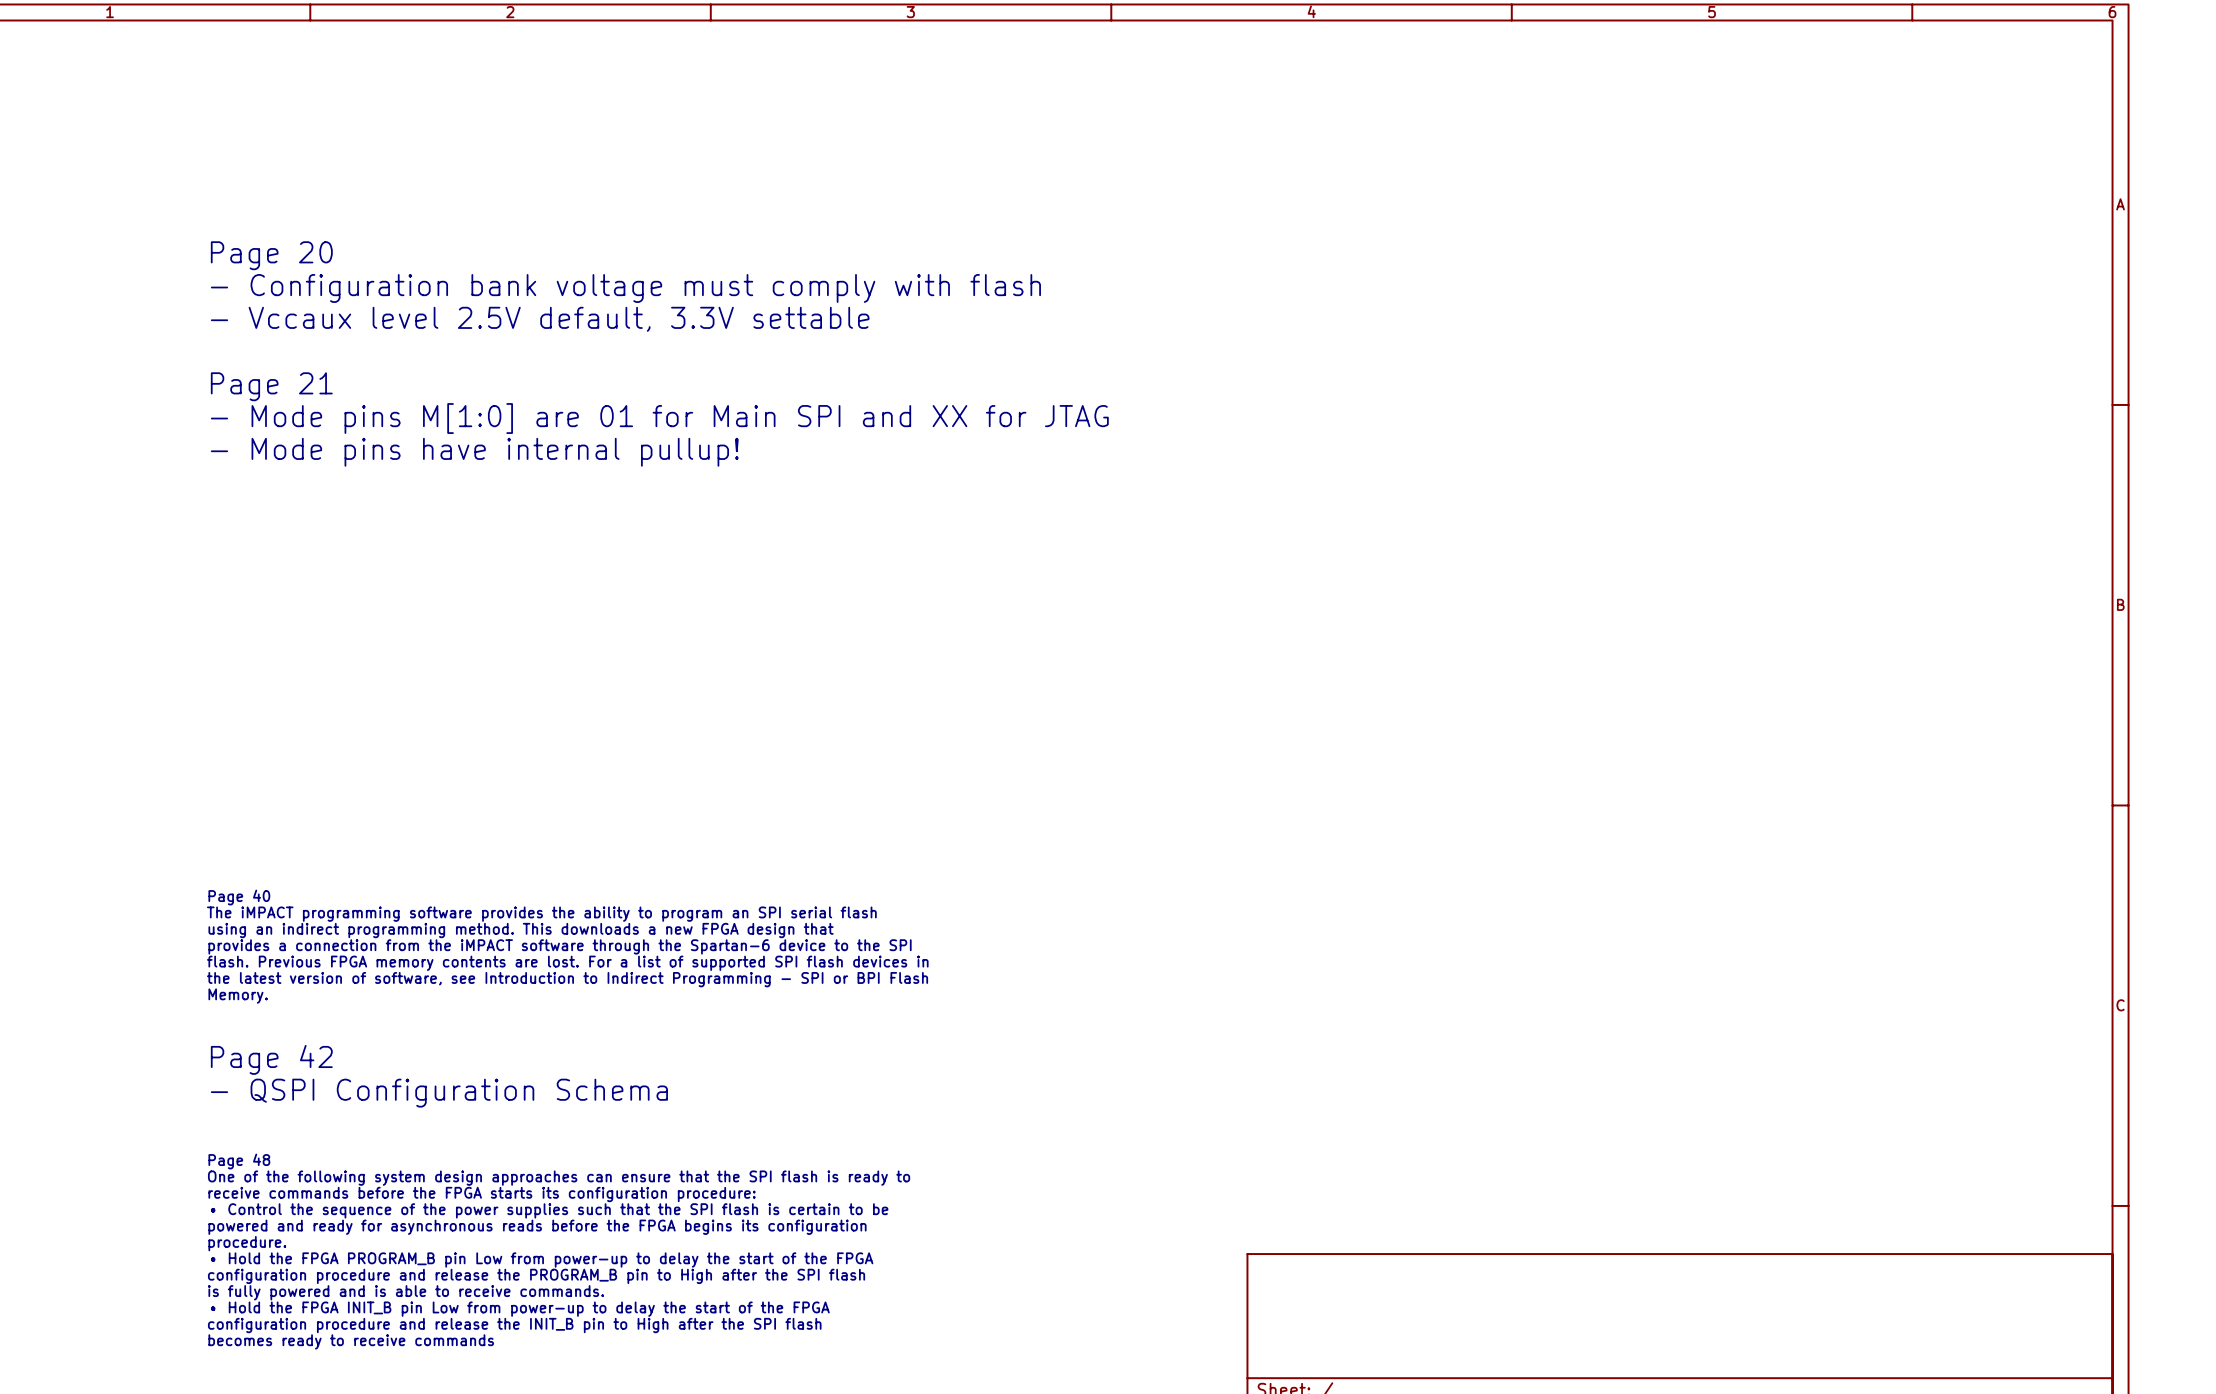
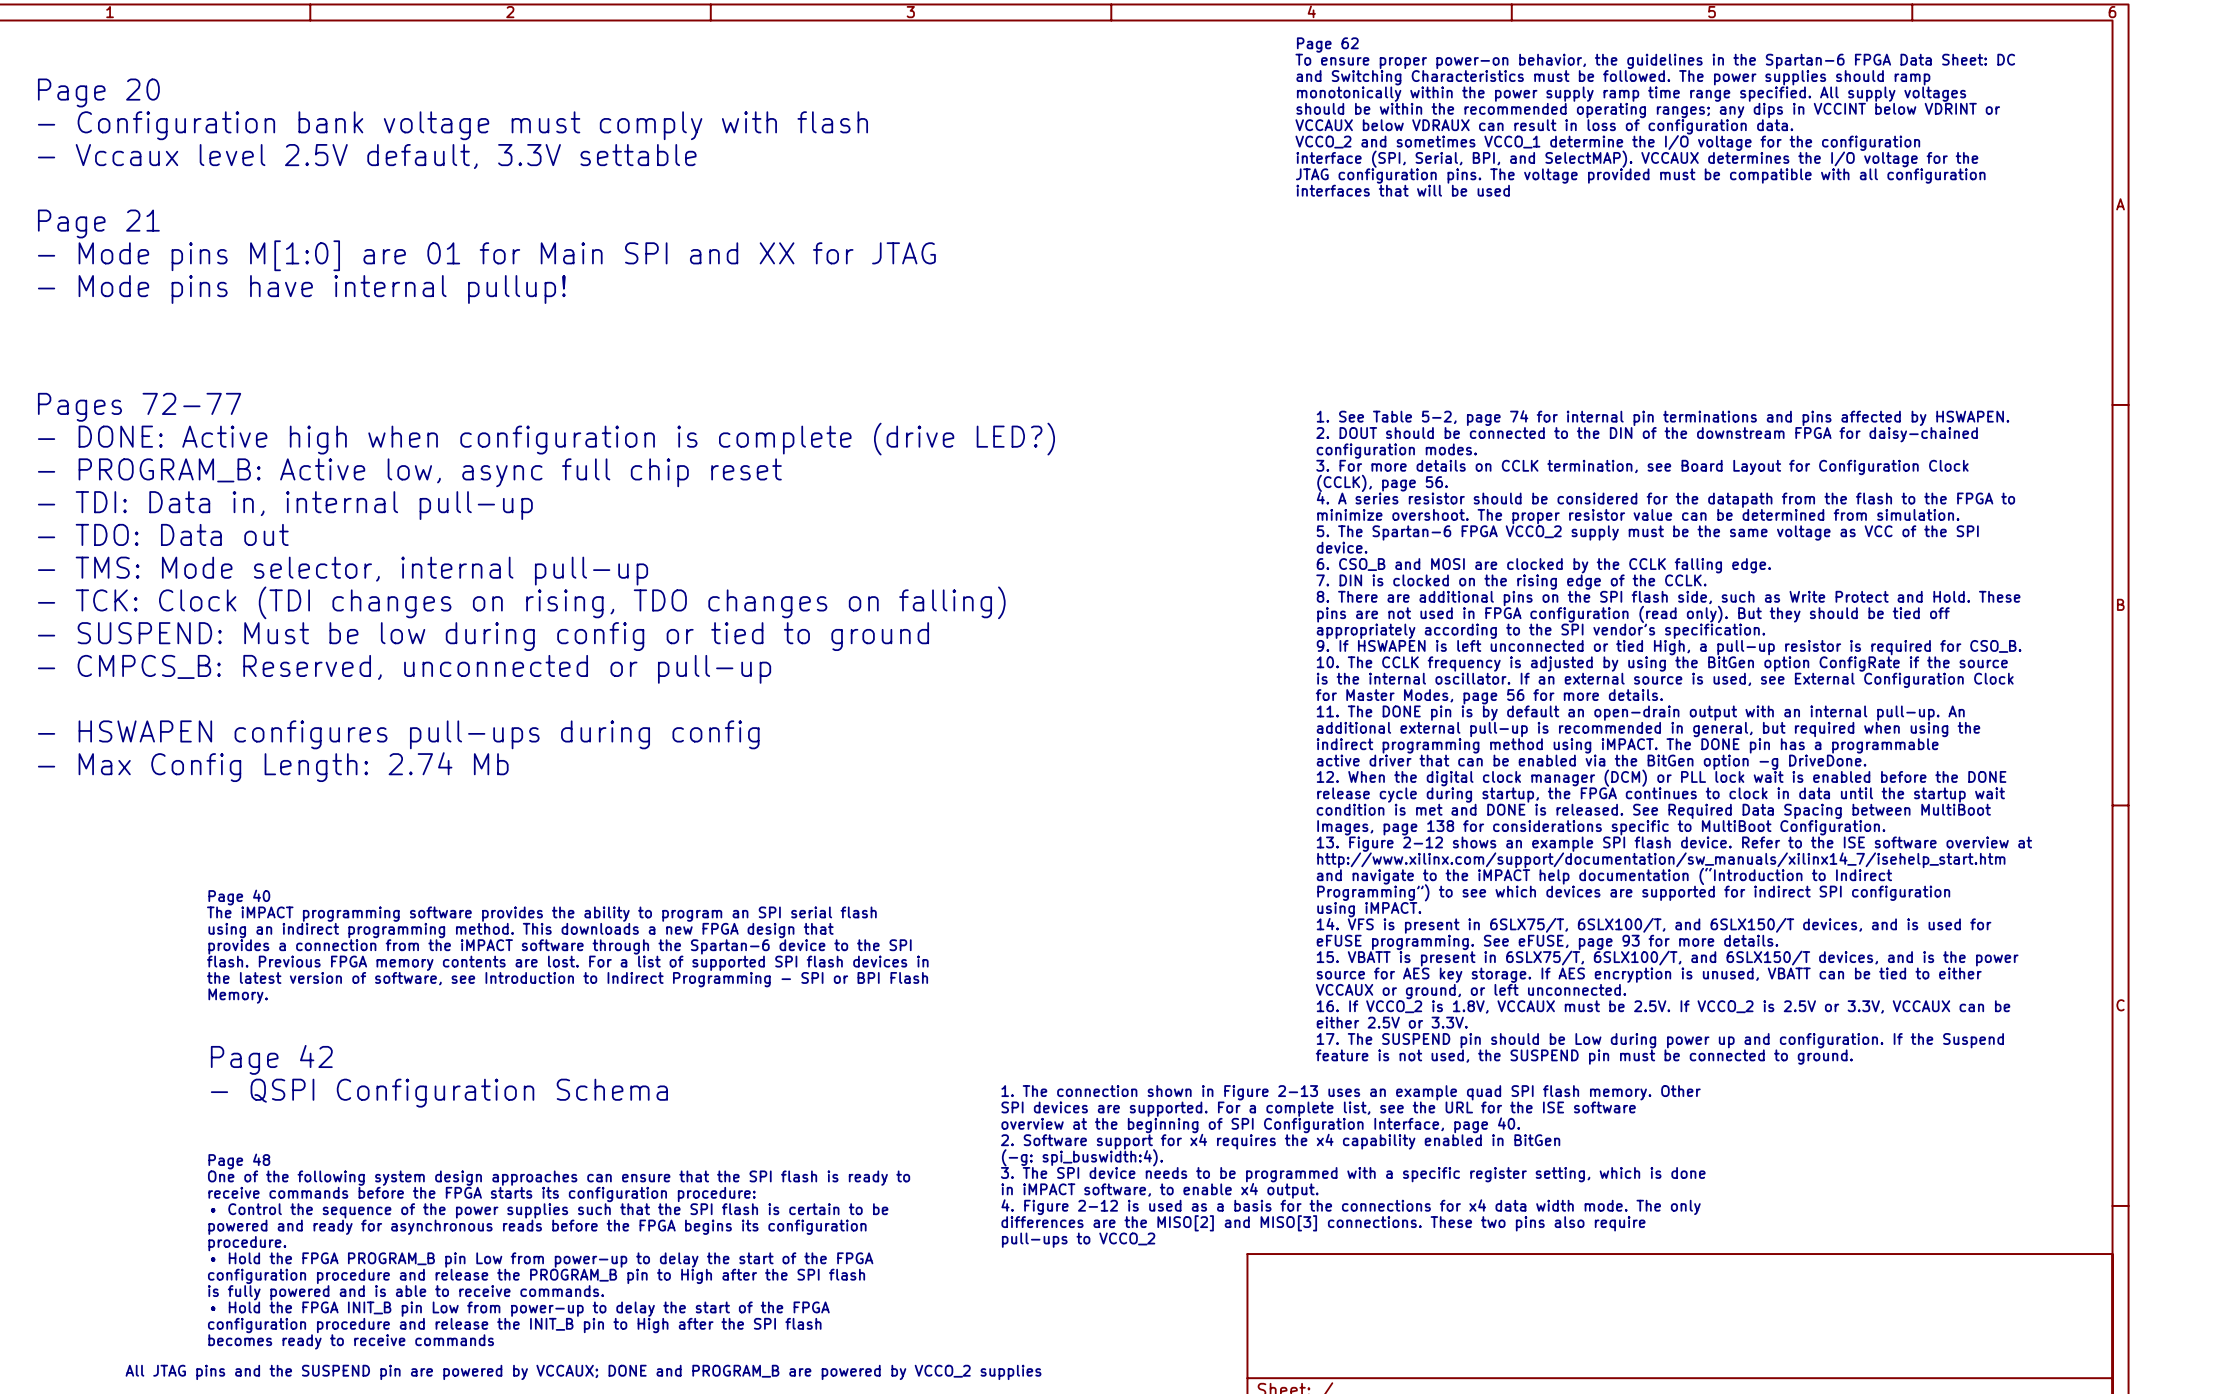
text: none -> Page 62 (1327, 45)
text: none -> To ensure proper power-on behavior, the guidelines in the Spartan-6 FPGA Data Sheet: DC (1655, 61)
text: none -> and Switching Characteristics must be followed. The power supplies should ramp (1613, 77)
text: none -> Page 20 (98, 92)
text: none -> monotonically within the power supply ramp time range specified. All supply voltages (1631, 94)
text: none -> should be within the recommended operating ranges; any dips in VCCINT below VDRINT or (1648, 110)
text: none -> - Configuration bank voltage must comply with flash (452, 125)
text: none -> VCCAUX below VDRAUX can result in loss of configuration data. (1544, 126)
text: none -> VCCO_2 and sometimes VCCO_1 determine the I/O voltage for the configuration (1607, 143)
text: none -> - Vccaux level 2.5V default, 3.3V settable (367, 156)
text: none -> interface (SPI, Serial, BPI, and SelectMAP). VCCAUX determines the I/O voltage for the (1637, 159)
text: none -> JTAG configuration pins. The voltage provided must be compatible with all configuration (1640, 176)
text: none -> interfaces that will be used (1403, 190)
text: none -> Page 21 (98, 223)
text: Page 20 (271, 255) -> none
text: none -> - Mode pins M[1:0] are 01 for Main SPI and XX for JTAG (486, 255)
text: - Configuration bank voltage must comply with flash (625, 288) -> none
text: none -> - Mode pins have internal pullup! (301, 289)
text: - Vccaux level 2.5V default, 3.3V settable (540, 319) -> none
text: Page 21 (271, 386) -> Pages 72-77 (139, 407)
text: - Mode pins M[1:0] are 01 for Main SPI and XX for JTAG (659, 418) -> none
text: none -> 1. See Table 5-2, page 74 for internal pin terminations and pins affected by HSWAPEN. (1663, 418)
text: none -> 2. DOUT should be connected to the DIN of the downstream FPGA for daisy-chained (1647, 434)
text: none -> - DONE: Active high when configuration is complete (drive LED?) (546, 439)
text: none -> configuration modes. (1396, 451)
text: - Mode pins have internal pullup! (474, 452) -> none
text: none -> 3. For more details on CCLK termination, see Board Layout for Configuration Clock (1642, 467)
text: none -> - PROGRAM_B: Active low, async full chip reset (409, 472)
text: none -> (CCLK), page 56. (1382, 483)
text: none -> 4. A series resistor should be considered for the datapath from the flash to the FPGA to (1665, 499)
text: none -> - TDI: Data in, internal pull-up (285, 505)
text: none -> minimize overshoot. The proper resistor value can be determined from simulation. (1638, 516)
text: none -> 5. The Spartan-6 FPGA VCCO_2 supply must be the same voltage as VCC of the SPI (1647, 532)
text: none -> - TDO: Data out (163, 534)
text: none -> device. (1342, 547)
text: none -> 6. CSO_B and MOSI are clocked by the CCLK falling edge. (1543, 565)
text: none -> - TMS: Mode selector, internal pull-up (343, 571)
text: none -> 7. DIN is clocked on the rising edge of the CCLK. (1511, 582)
text: none -> 8. There are additional pins on the SPI flash side, such as Write Protect and Hold. These (1668, 598)
text: none -> - TCK: Clock (TDI changes on rising, TDO changes on falling) (521, 602)
text: none -> pins are not used in FPGA configuration (read only). But they should be tied off (1633, 614)
text: none -> appropriately according to the SPI vendor’s specification. (1540, 631)
text: none -> - SUSPEND: Must be low during config or tied to ground (483, 636)
text: none -> 9. If HSWAPEN is left unconnected or tied High, a pull-up resistor is required for CSO_B. (1669, 647)
text: none -> 10. The CCLK frequency is adjusted by using the BitGen option ConfigRate if the source (1662, 664)
text: none -> - CMPCS_B: Reserved, unconnected or pull-up (404, 669)
text: none -> is the internal oscillator. If an external source is used, see External Configuration Clock (1665, 680)
text: none -> for Master Modes, page 56 for more details. (1489, 696)
text: none -> 11. The DONE pin is by default an open-drain output with an internal pull-up. An (1640, 713)
text: none -> additional external pull-up is recommended in general, but required when using the (1648, 729)
text: none -> - HSWAPEN configures pull-ups during config (398, 734)
text: none -> indirect programming method using iMPACT. The DONE pin has a programmable (1627, 745)
text: none -> active driver that can be enabled via the BitGen option -g DriveDone. (1591, 762)
text: none -> - Max Config Length: 2.74 Mb (273, 767)
text: none -> 12. When the digital clock manager (DCM) or PLL lock wait is enabled before the DONE (1661, 778)
text: none -> release cycle during startup, the FPGA continues to clock in data until the startup wait (1661, 795)
text: none -> condition is met and DONE is released. See Required Data Spacing between MultiBoot (1653, 811)
text: none -> Images, page 138 for considerations specific to MultiBoot Configuration. (1601, 827)
text: none -> 13. Figure 2-12 shows an example SPI flash device. Refer to the ISE software overview at (1674, 844)
text: none -> http://www.xilinx.com/support/documentation/sw_manuals/xilinx14_7/isehelp_start.htm (1661, 860)
text: none -> and navigate to the iMPACT help documentation (“Introduction to Indirect (1604, 876)
text: none -> Programming”) to see which devices are supported for indirect SPI configuration (1633, 892)
text: none -> using iMPACT. (1369, 909)
text: none -> 14. VFS is present in 6SLX75/T, 6SLX100/T, and 6SLX150/T devices, and is used for (1654, 925)
text: none -> eFUSE programming. See eFUSE, page 93 for more details. (1547, 942)
text: none -> 15. VBATT is present in 6SLX75/T, 6SLX100/T, and 6SLX150/T devices, and is the power (1667, 958)
text: none -> source for AES key storage. If AES encryption is unused, VBATT can be tied to either (1649, 975)
text: none -> VCCAUX or ground, or left unconnected. (1470, 991)
text: none -> 16. If VCCO_2 is 1.8V, VCCAUX must be 2.5V. If VCCO_2 is 2.5V or 3.3V, VCCAUX can be (1663, 1006)
text: none -> either 2.5V or 3.3V. (1392, 1022)
text: none -> 17. The SUSPEND pin should be Low during power up and configuration. If the Suspend (1660, 1040)
text: none -> feature is not used, the SUSPEND pin must be connected to ground. (1584, 1057)
text: none -> 1. The connection shown in Figure 2-13 uses an example quad SPI flash memory. Other (1351, 1092)
text: none -> SPI devices are supported. For a complete list, see the URL for the ISE software (1318, 1109)
text: none -> overview at the beginning of SPI Configuration Interface, page 40. (1260, 1125)
text: none -> 2. Software support for x4 requires the x4 capability enabled in BitGen (1280, 1141)
text: none -> (-g: spi_buswidth:4). (1082, 1157)
text: none -> 3. The SPI device needs to be programmed with a specific register setting, which is done (1353, 1174)
text: none -> in iMPACT software, to enable x4 output. (1159, 1190)
text: none -> 4. Figure 2-12 is used as a basis for the connections for x4 data width mode. The only (1351, 1207)
text: none -> differences are the MISO[2] and MISO[3] connections. These two pins also require (1323, 1223)
text: none -> pull-ups to VCCO_2 (1078, 1240)
text: none -> All JTAG pins and the SUSPEND pin are powered by VCCAUX; DONE and PROGRAM_B are powered by VCCO_2 supplies (583, 1372)

